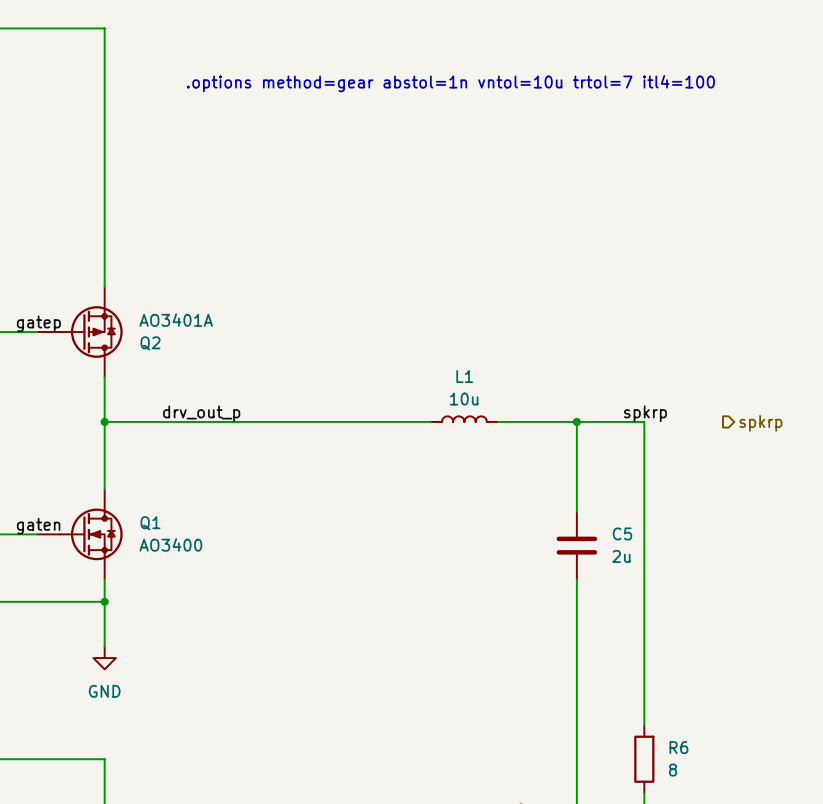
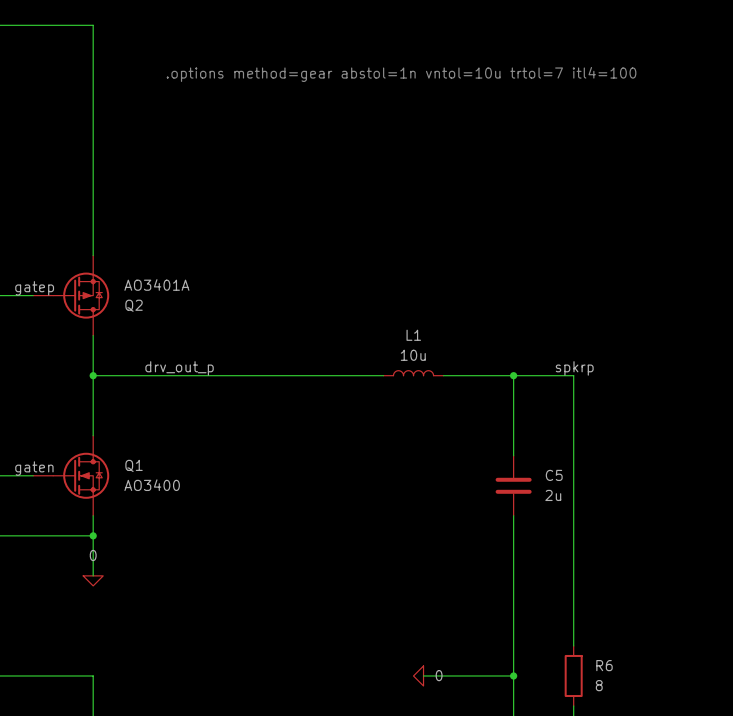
hierarchical label: spkrp (760, 423) -> none
power symbol: GND (104, 658) -> 0 (93, 580)
power symbol: none -> 0 (418, 675)
wire: none -> (423, 675) (513, 675)
junction: none -> (513, 675)

